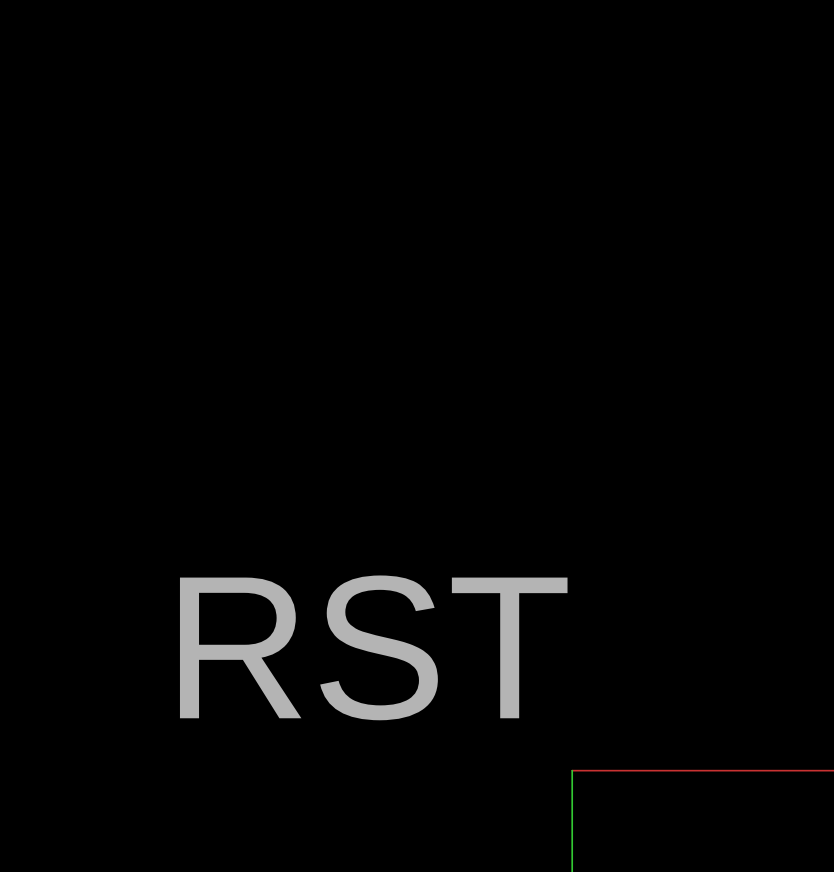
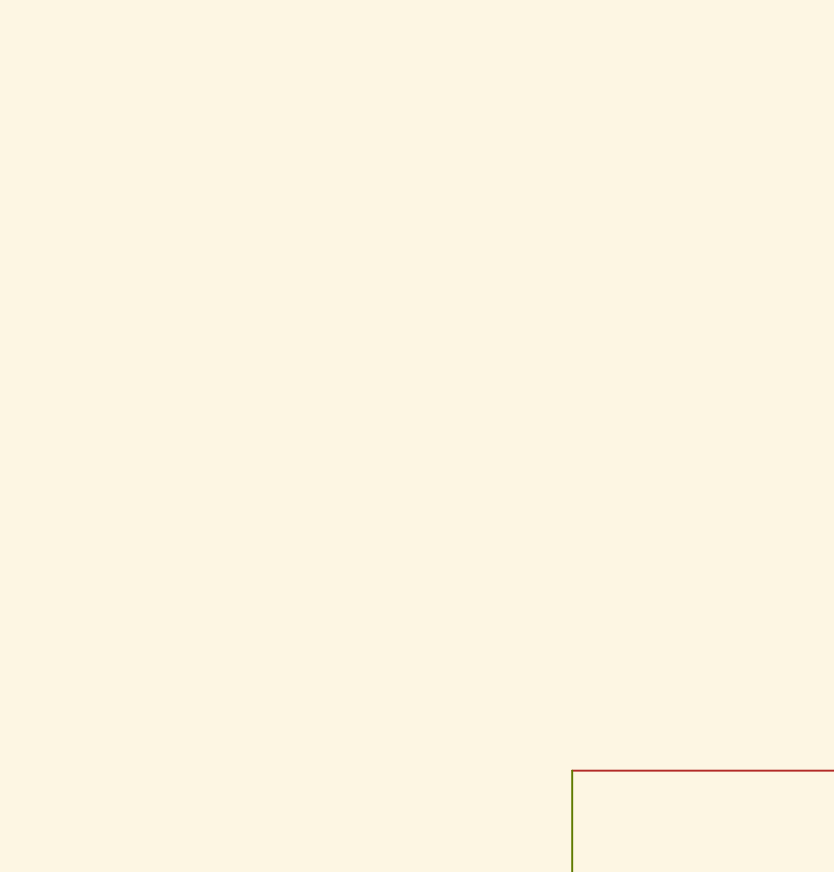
label: RST (373, 647) -> none

